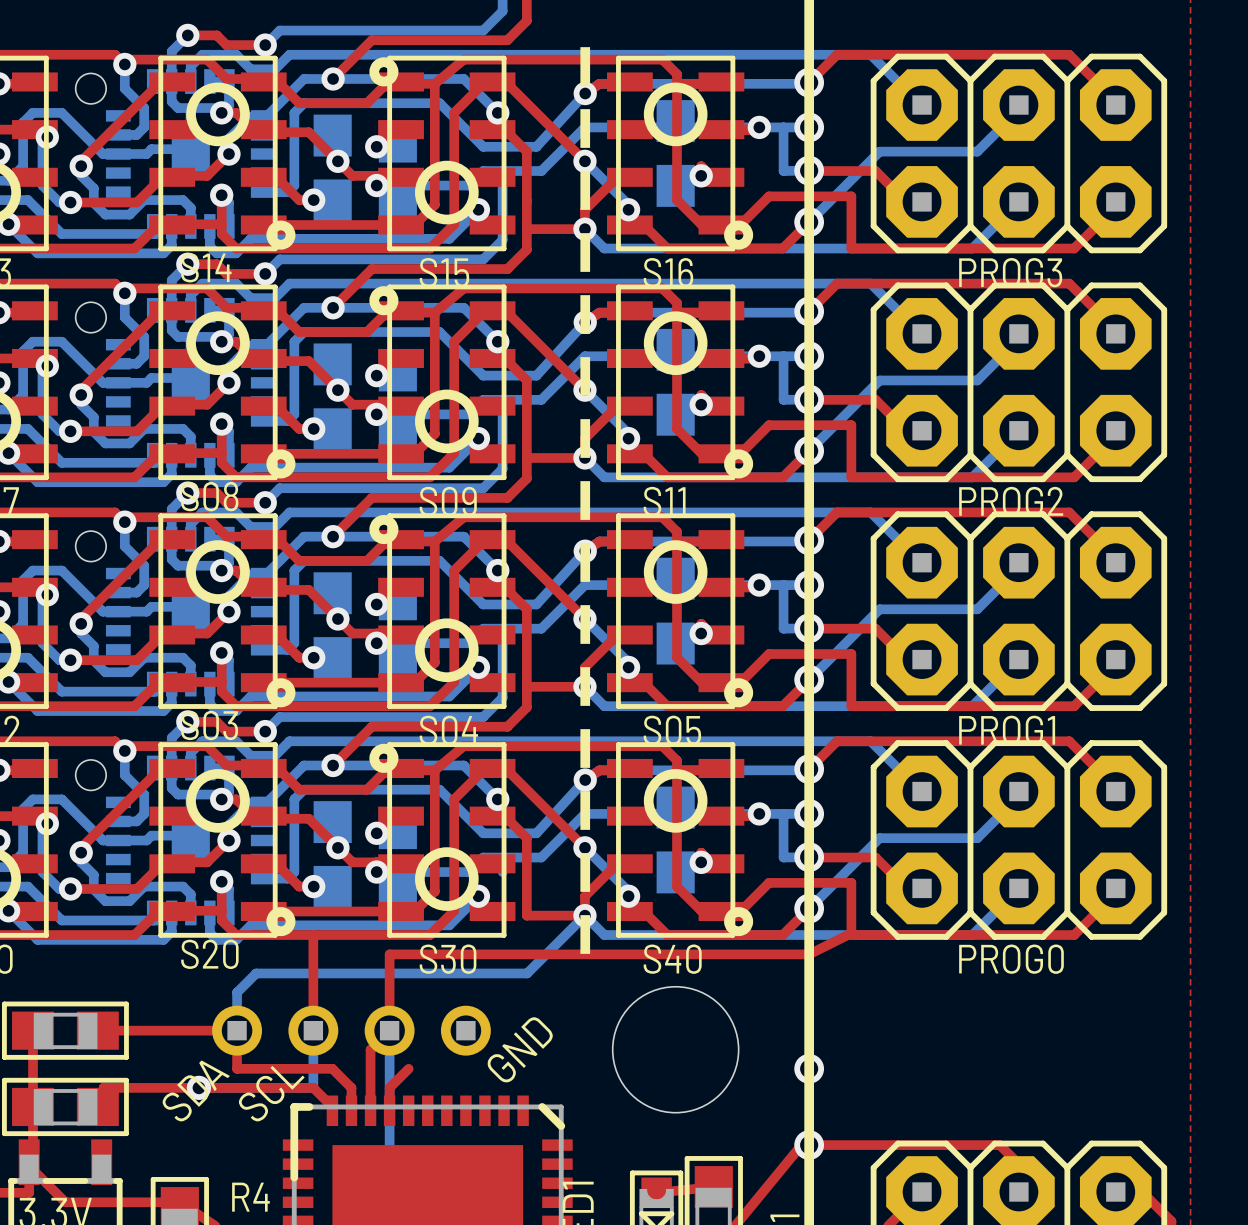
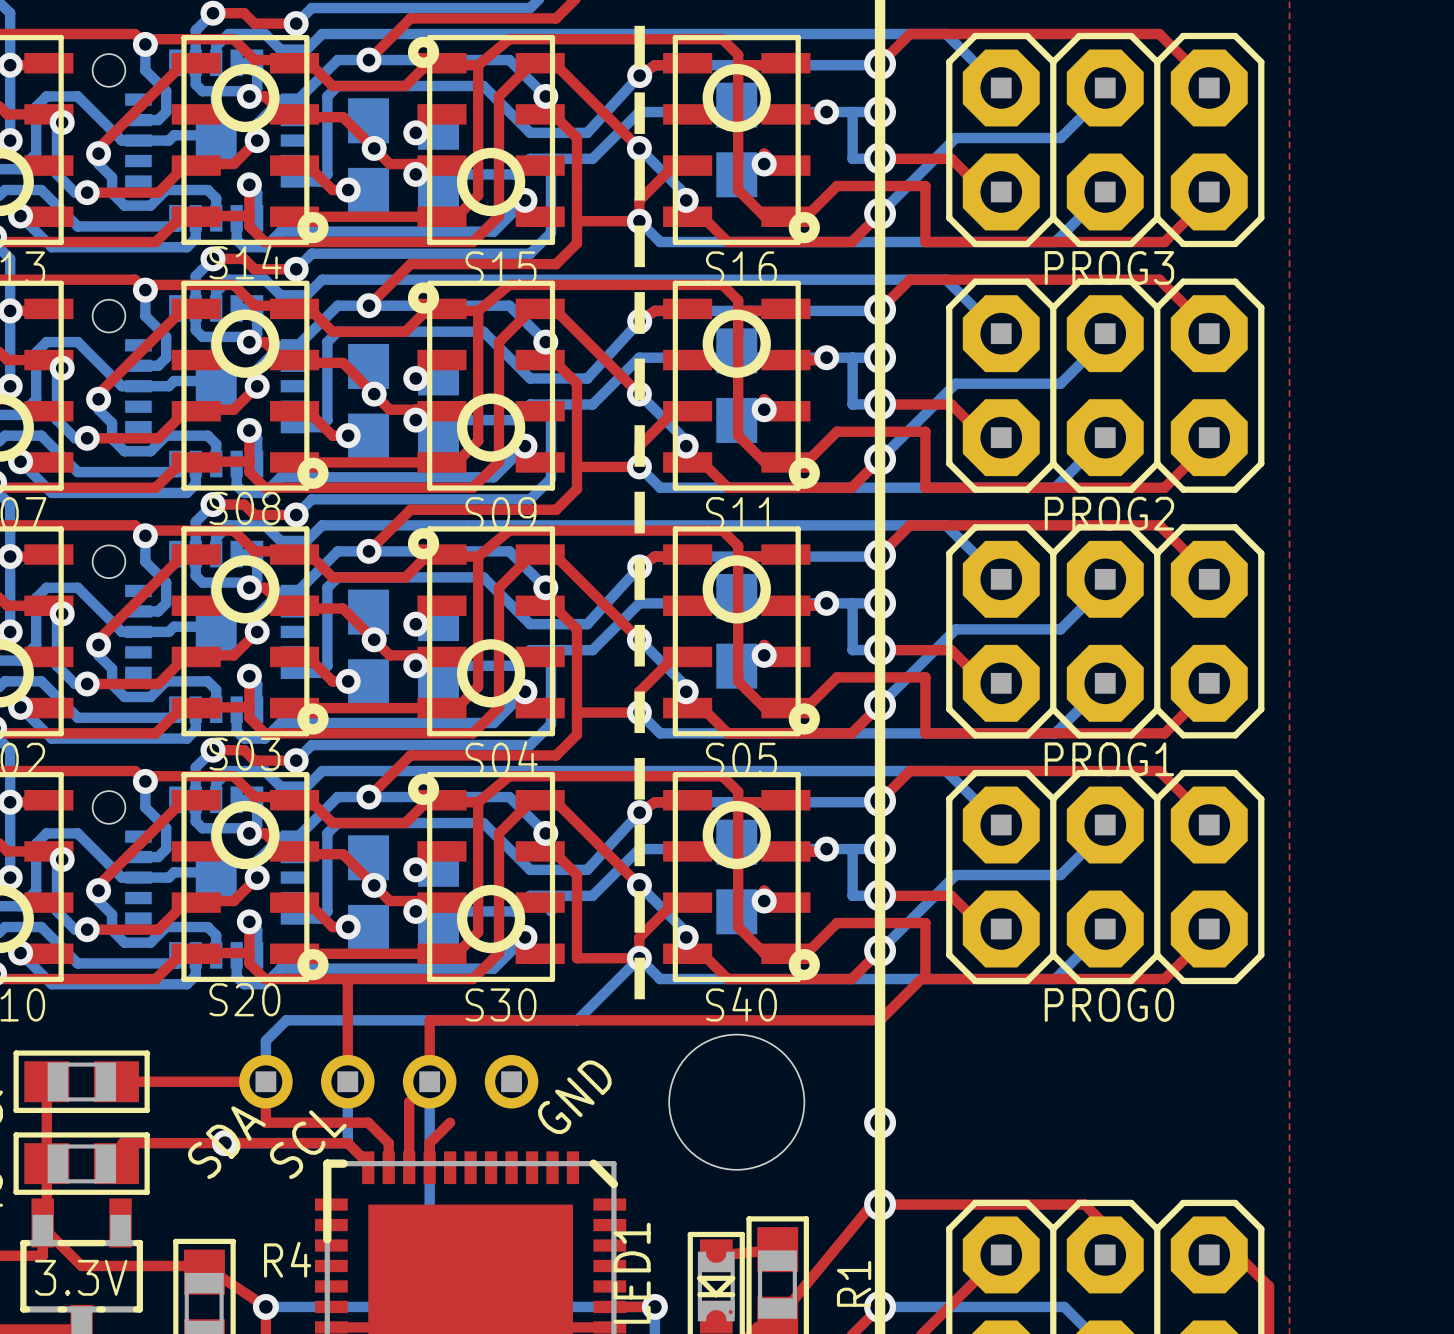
top track: (847, 935) (809, 954) (389, 954) (389, 973) -> (921, 979) (880, 1020) (429, 1020)

